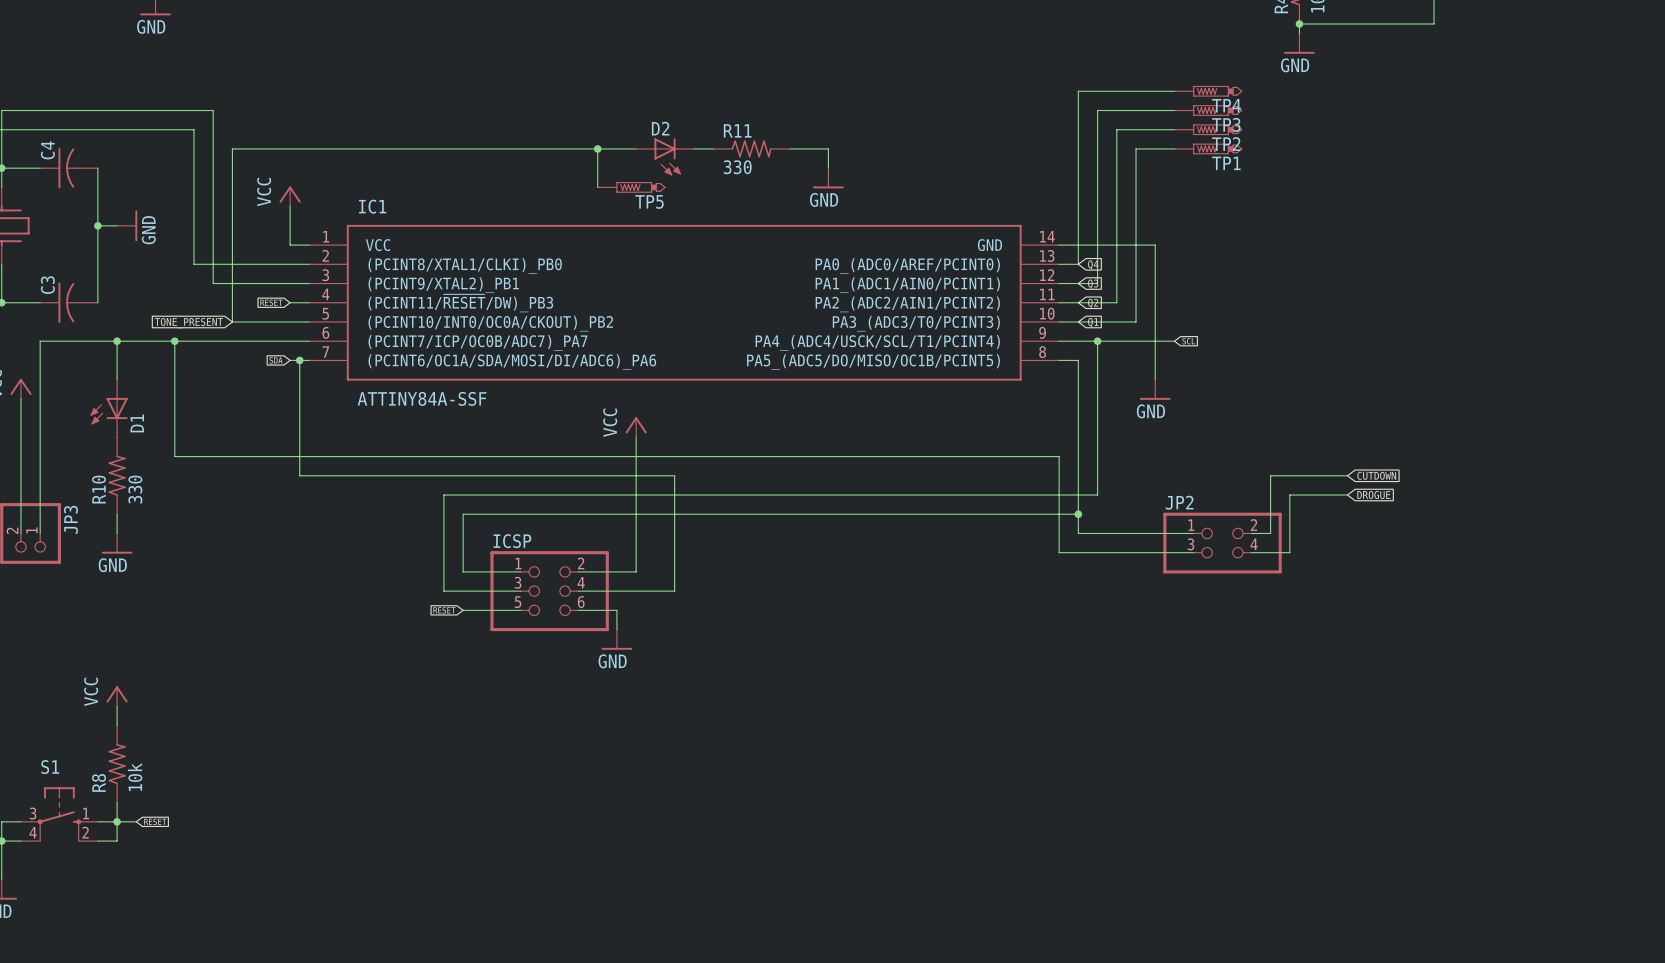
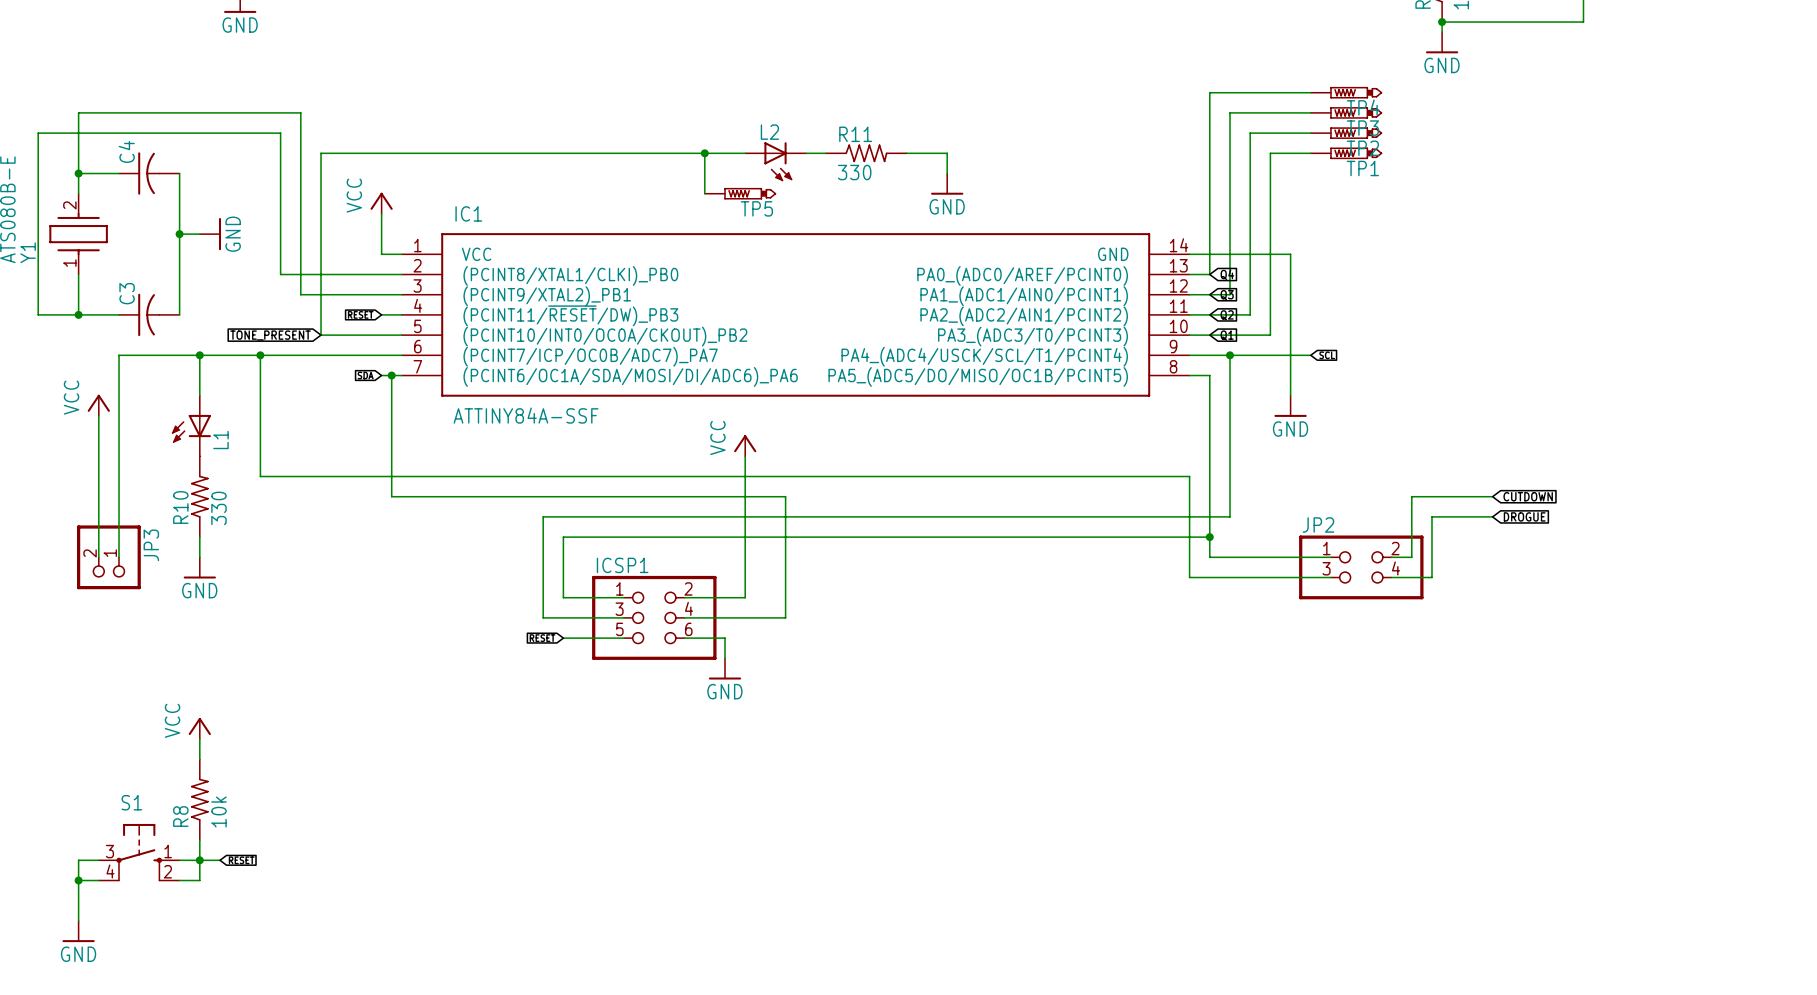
D2 name: D2 (660, 128) -> L2 (769, 132)
D1 name: D1 (137, 423) -> L1 (221, 440)
ICSP name: ICSP (512, 541) -> ICSP1 (622, 565)

